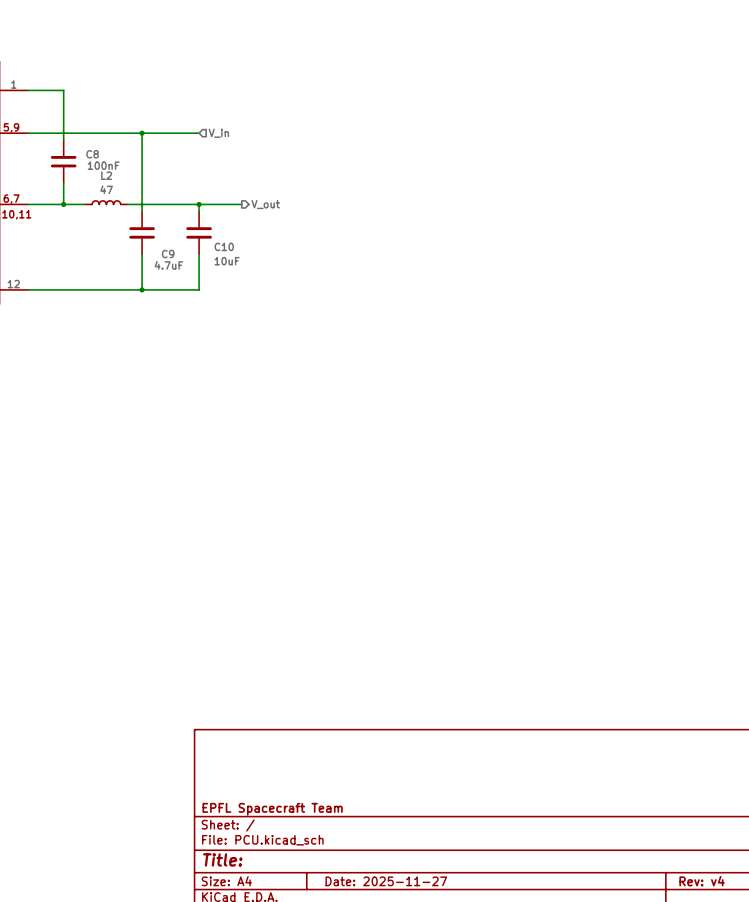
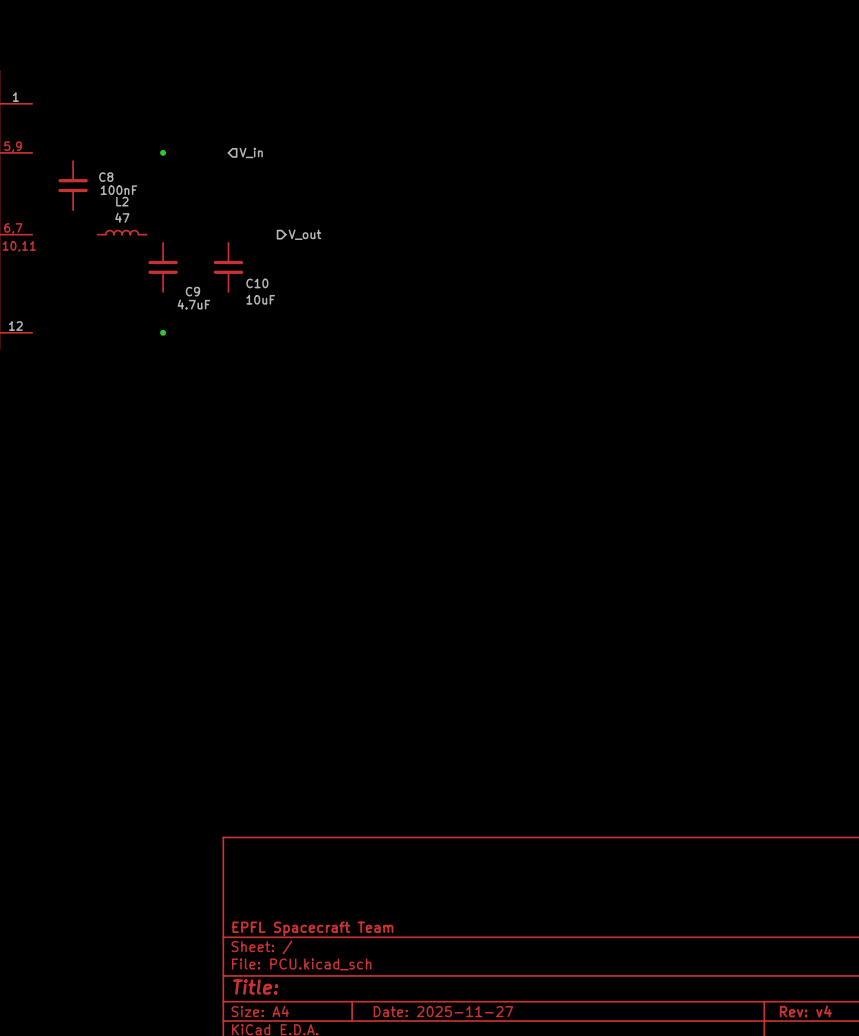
wire: (28, 90) (63, 90) (63, 140) -> none
wire: (28, 133) (199, 133) -> none
wire: (142, 133) (142, 211) -> none
wire: (63, 183) (63, 204) -> none
wire: (28, 204) (85, 204) -> none
junction: (63, 204) -> none
wire: (127, 204) (241, 204) -> none
wire: (199, 204) (199, 211) -> none
junction: (199, 204) -> none
wire: (142, 254) (142, 289) -> none
wire: (199, 254) (199, 289) (28, 289) -> none

